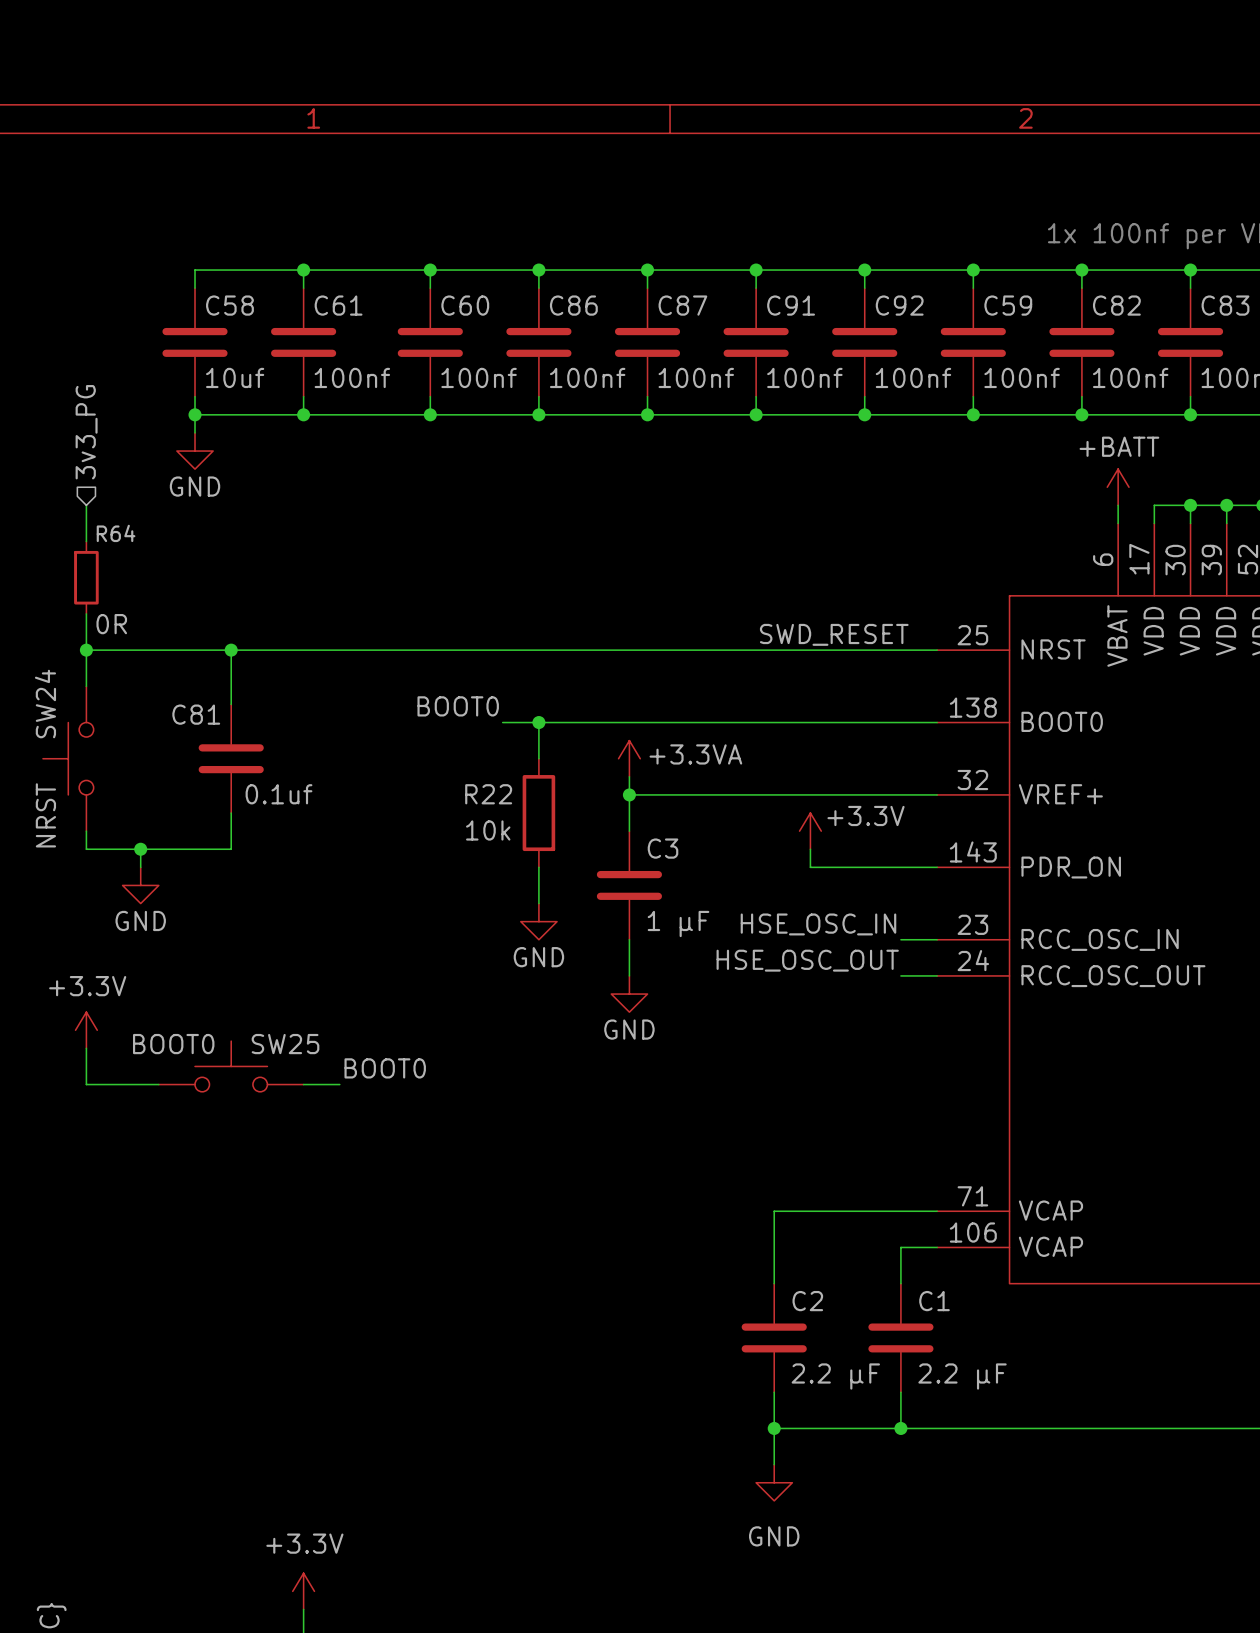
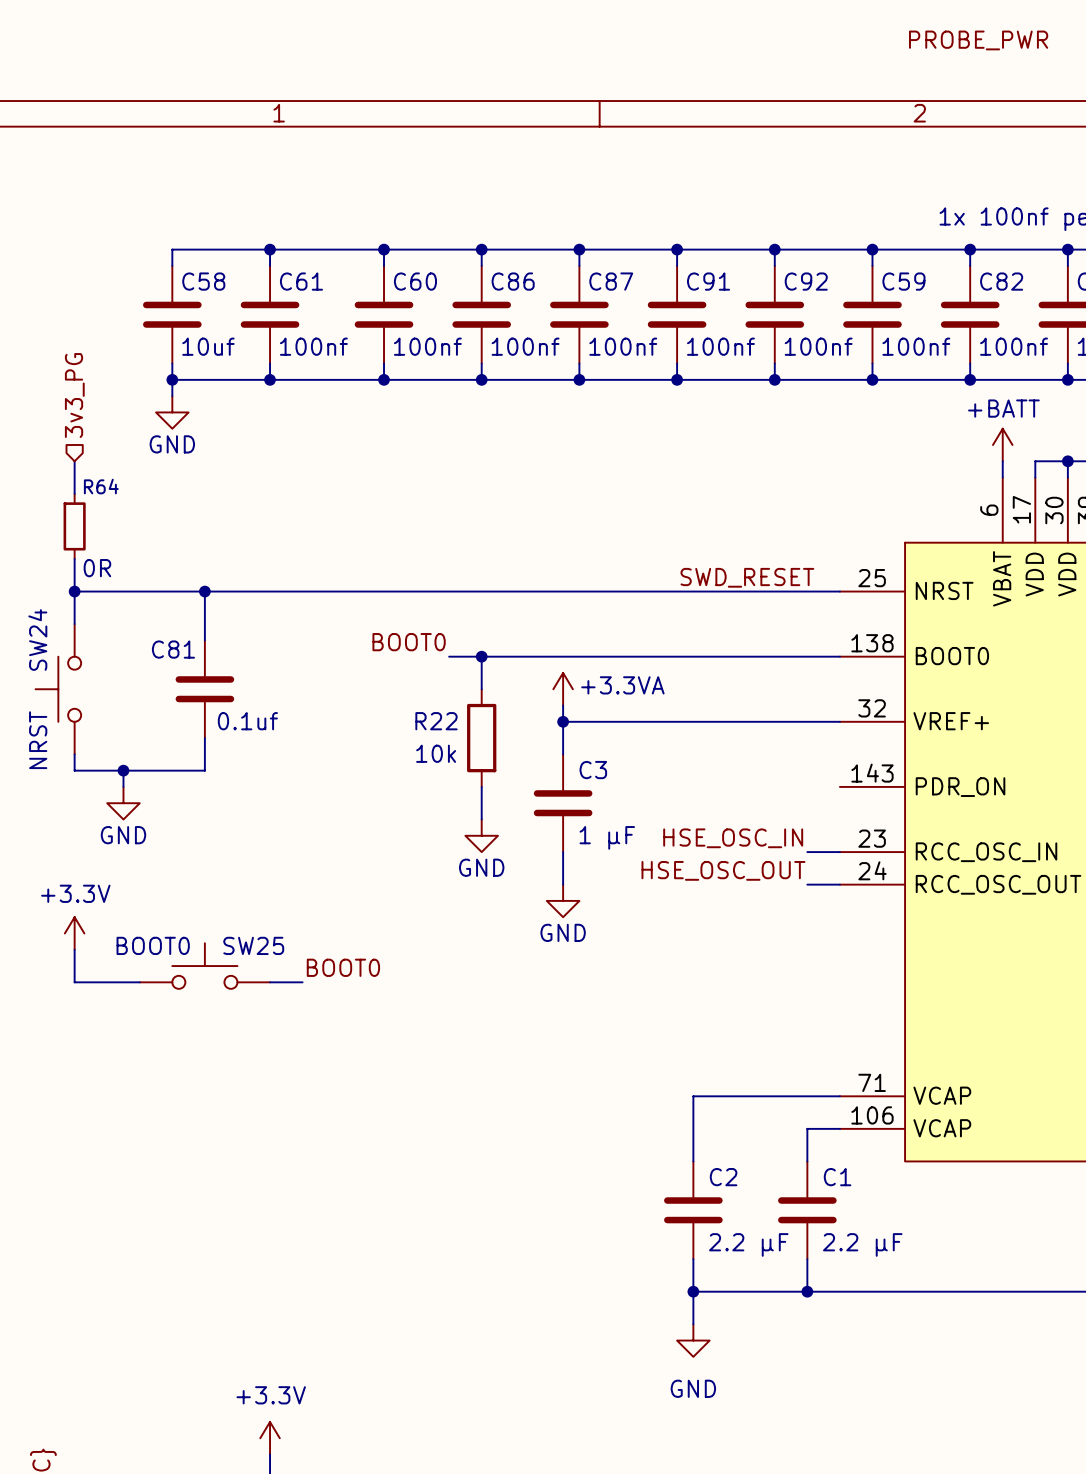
label: none -> PROBE_PWR (978, 40)
power symbol: +3.3V (810, 831) -> none
wire: (810, 849) (810, 867) (937, 867) -> none

